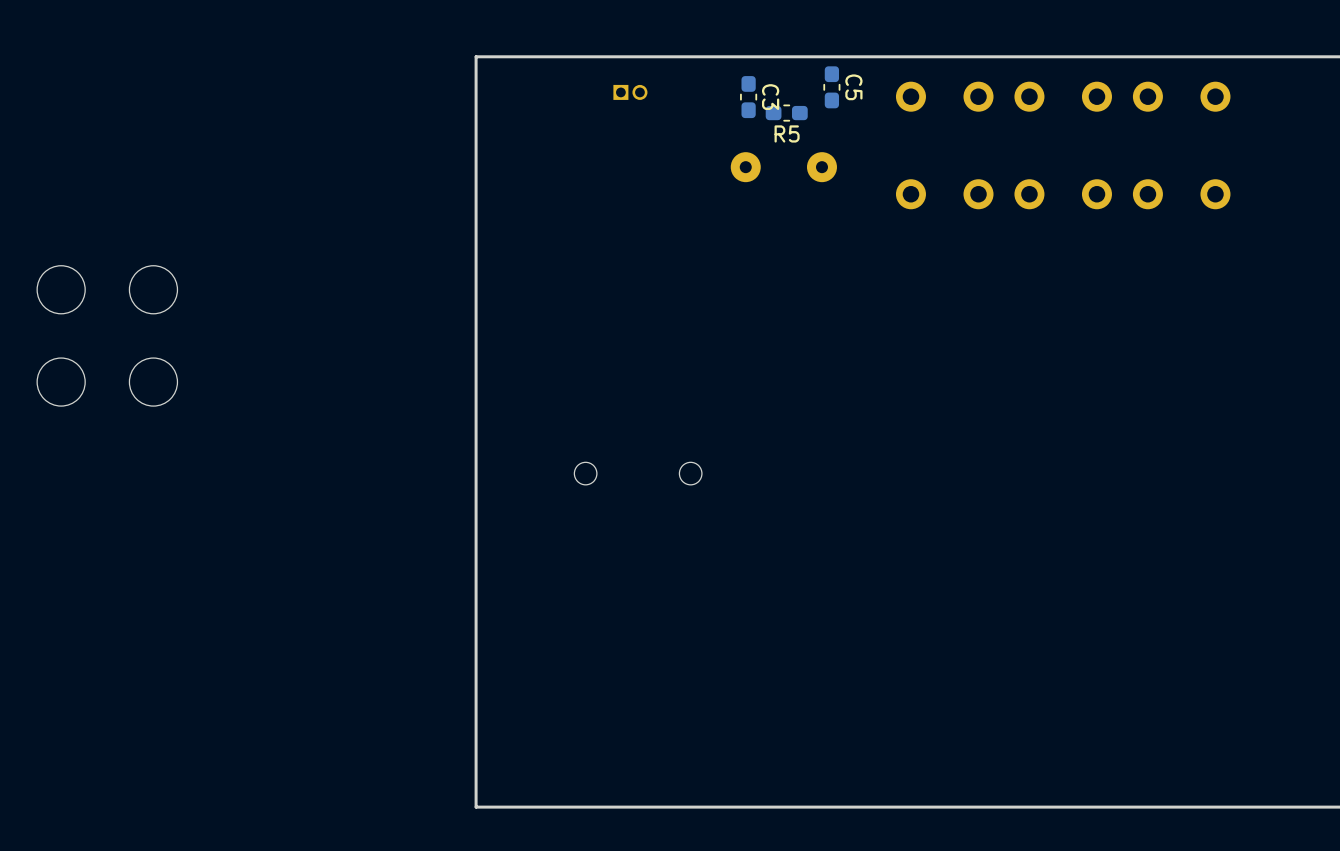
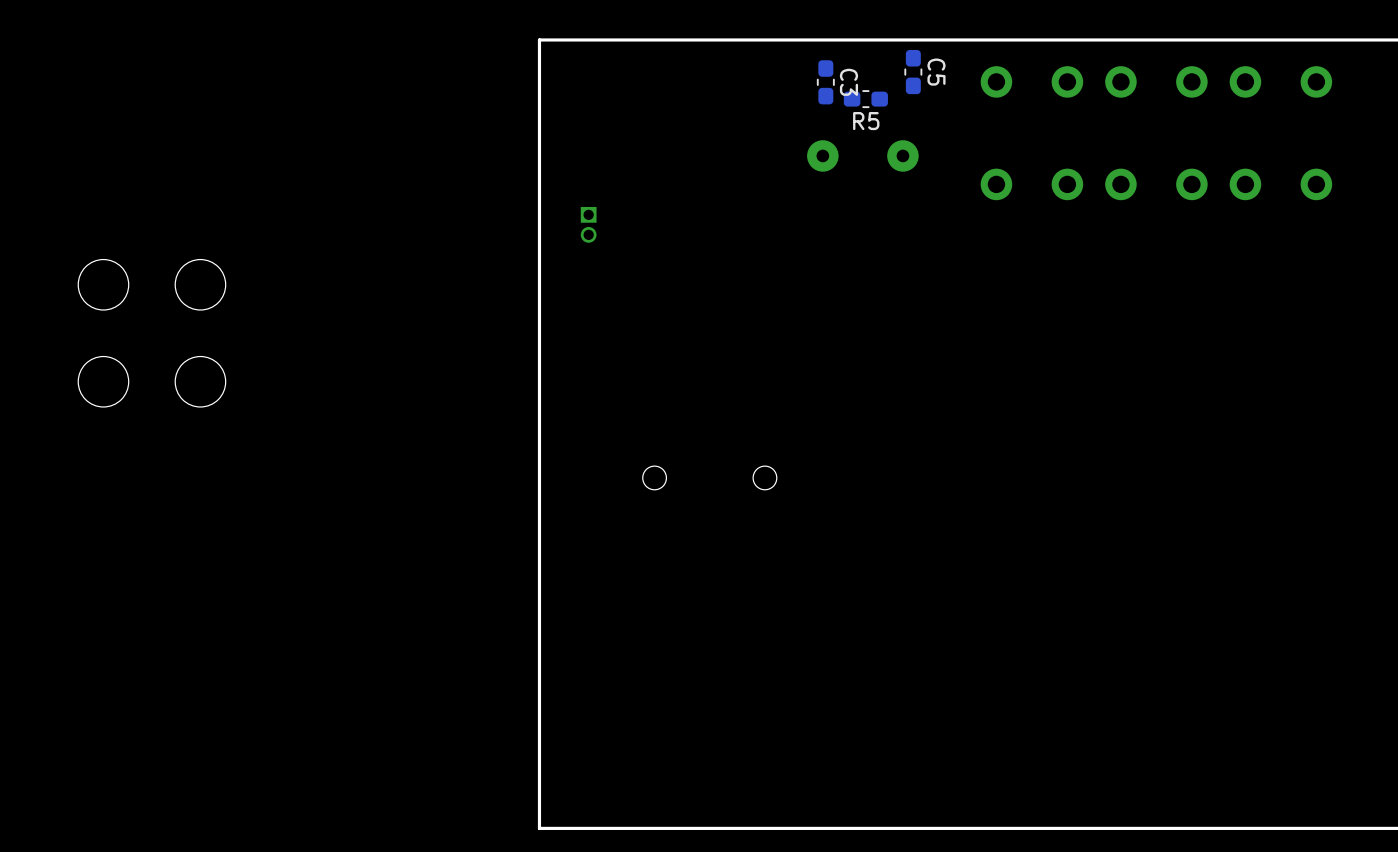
part rotation: 0° (630, 92) -> 90° clockwise (588, 224)
part position: (630, 92) -> (588, 224)

